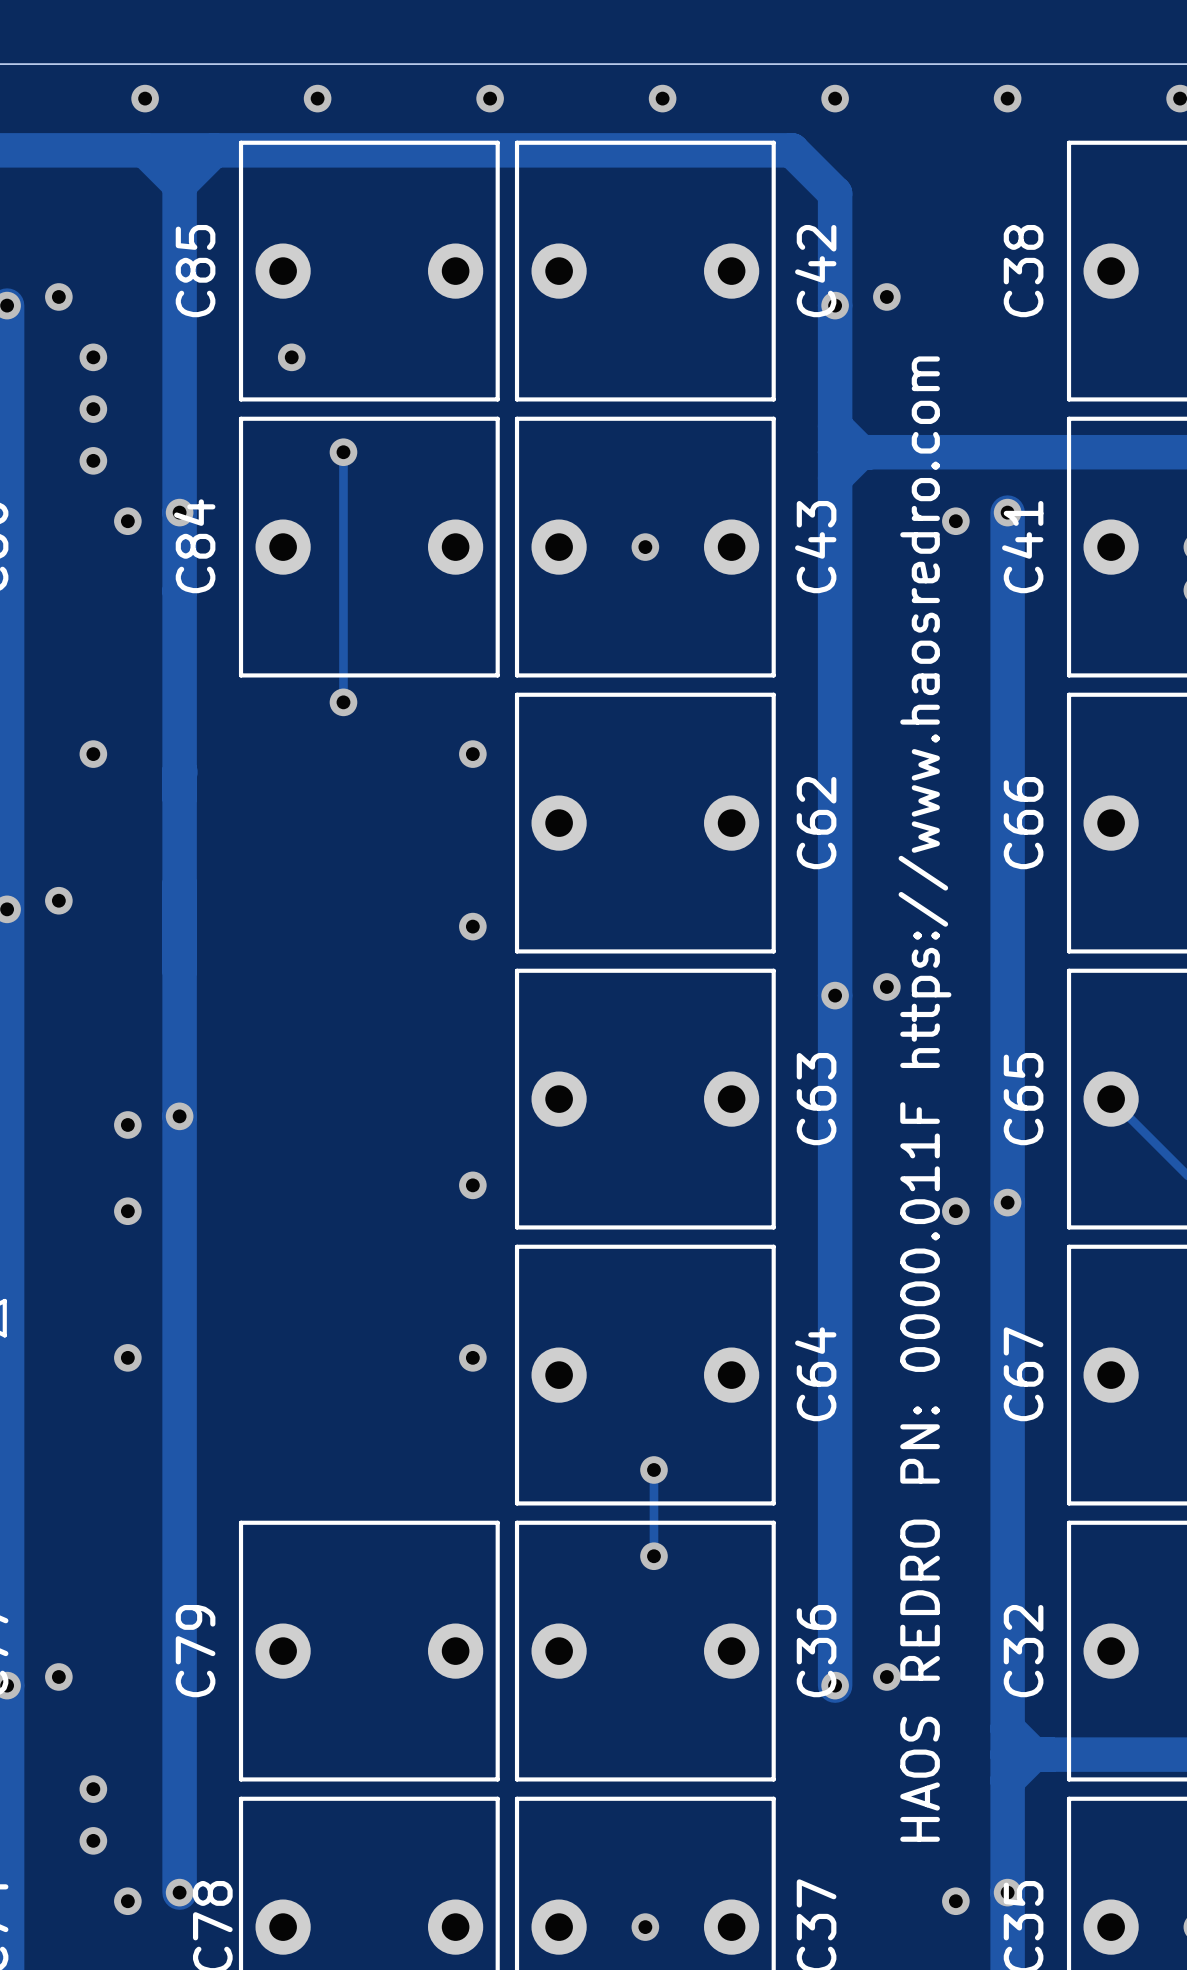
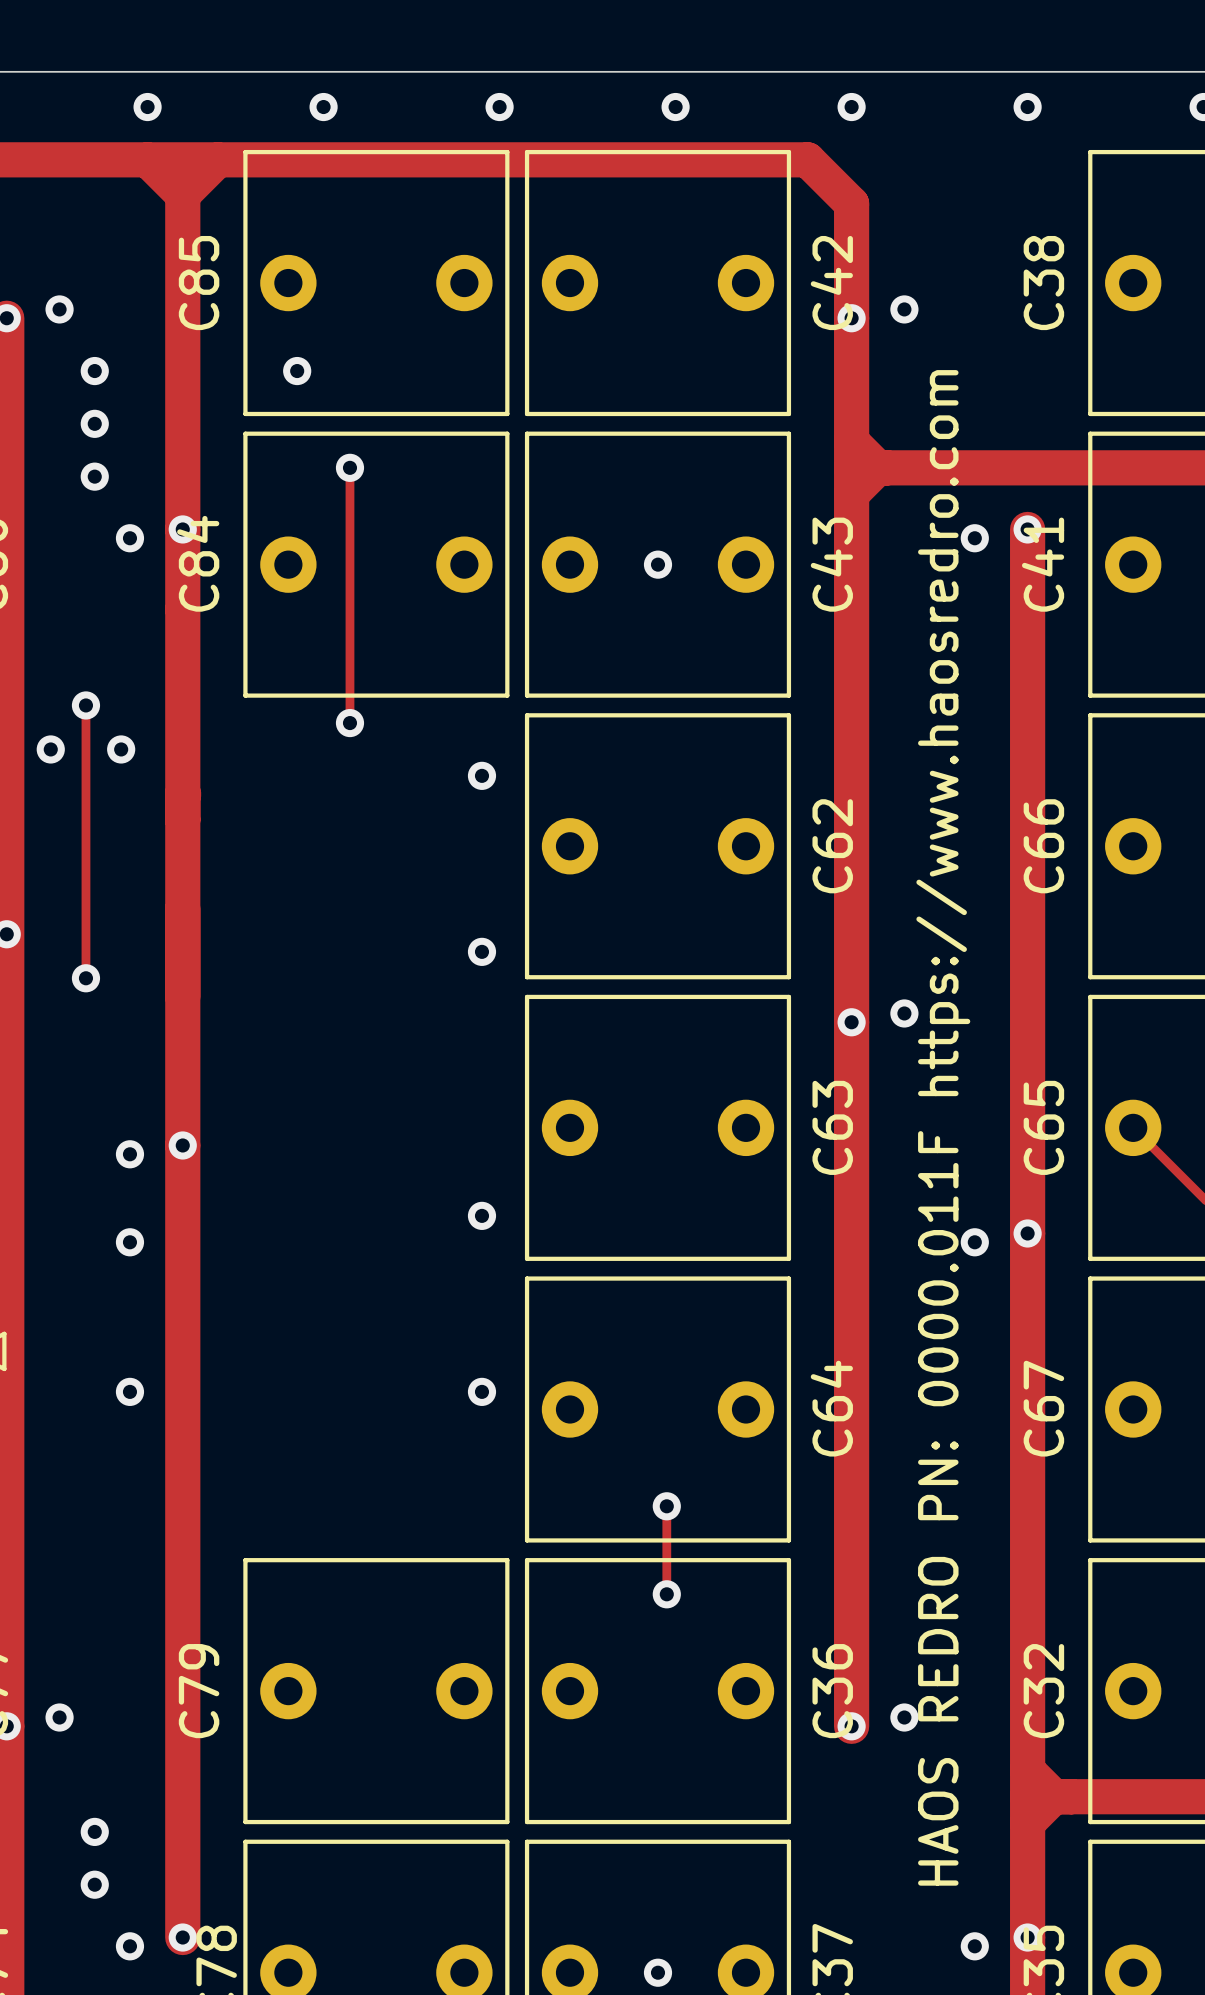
track: none -> (85, 705) (85, 978)
via: none -> (85, 705)
via: none -> (50, 749)
via: none -> (121, 749)
via: (93, 754) -> none
via position: (58, 900) -> (85, 978)

